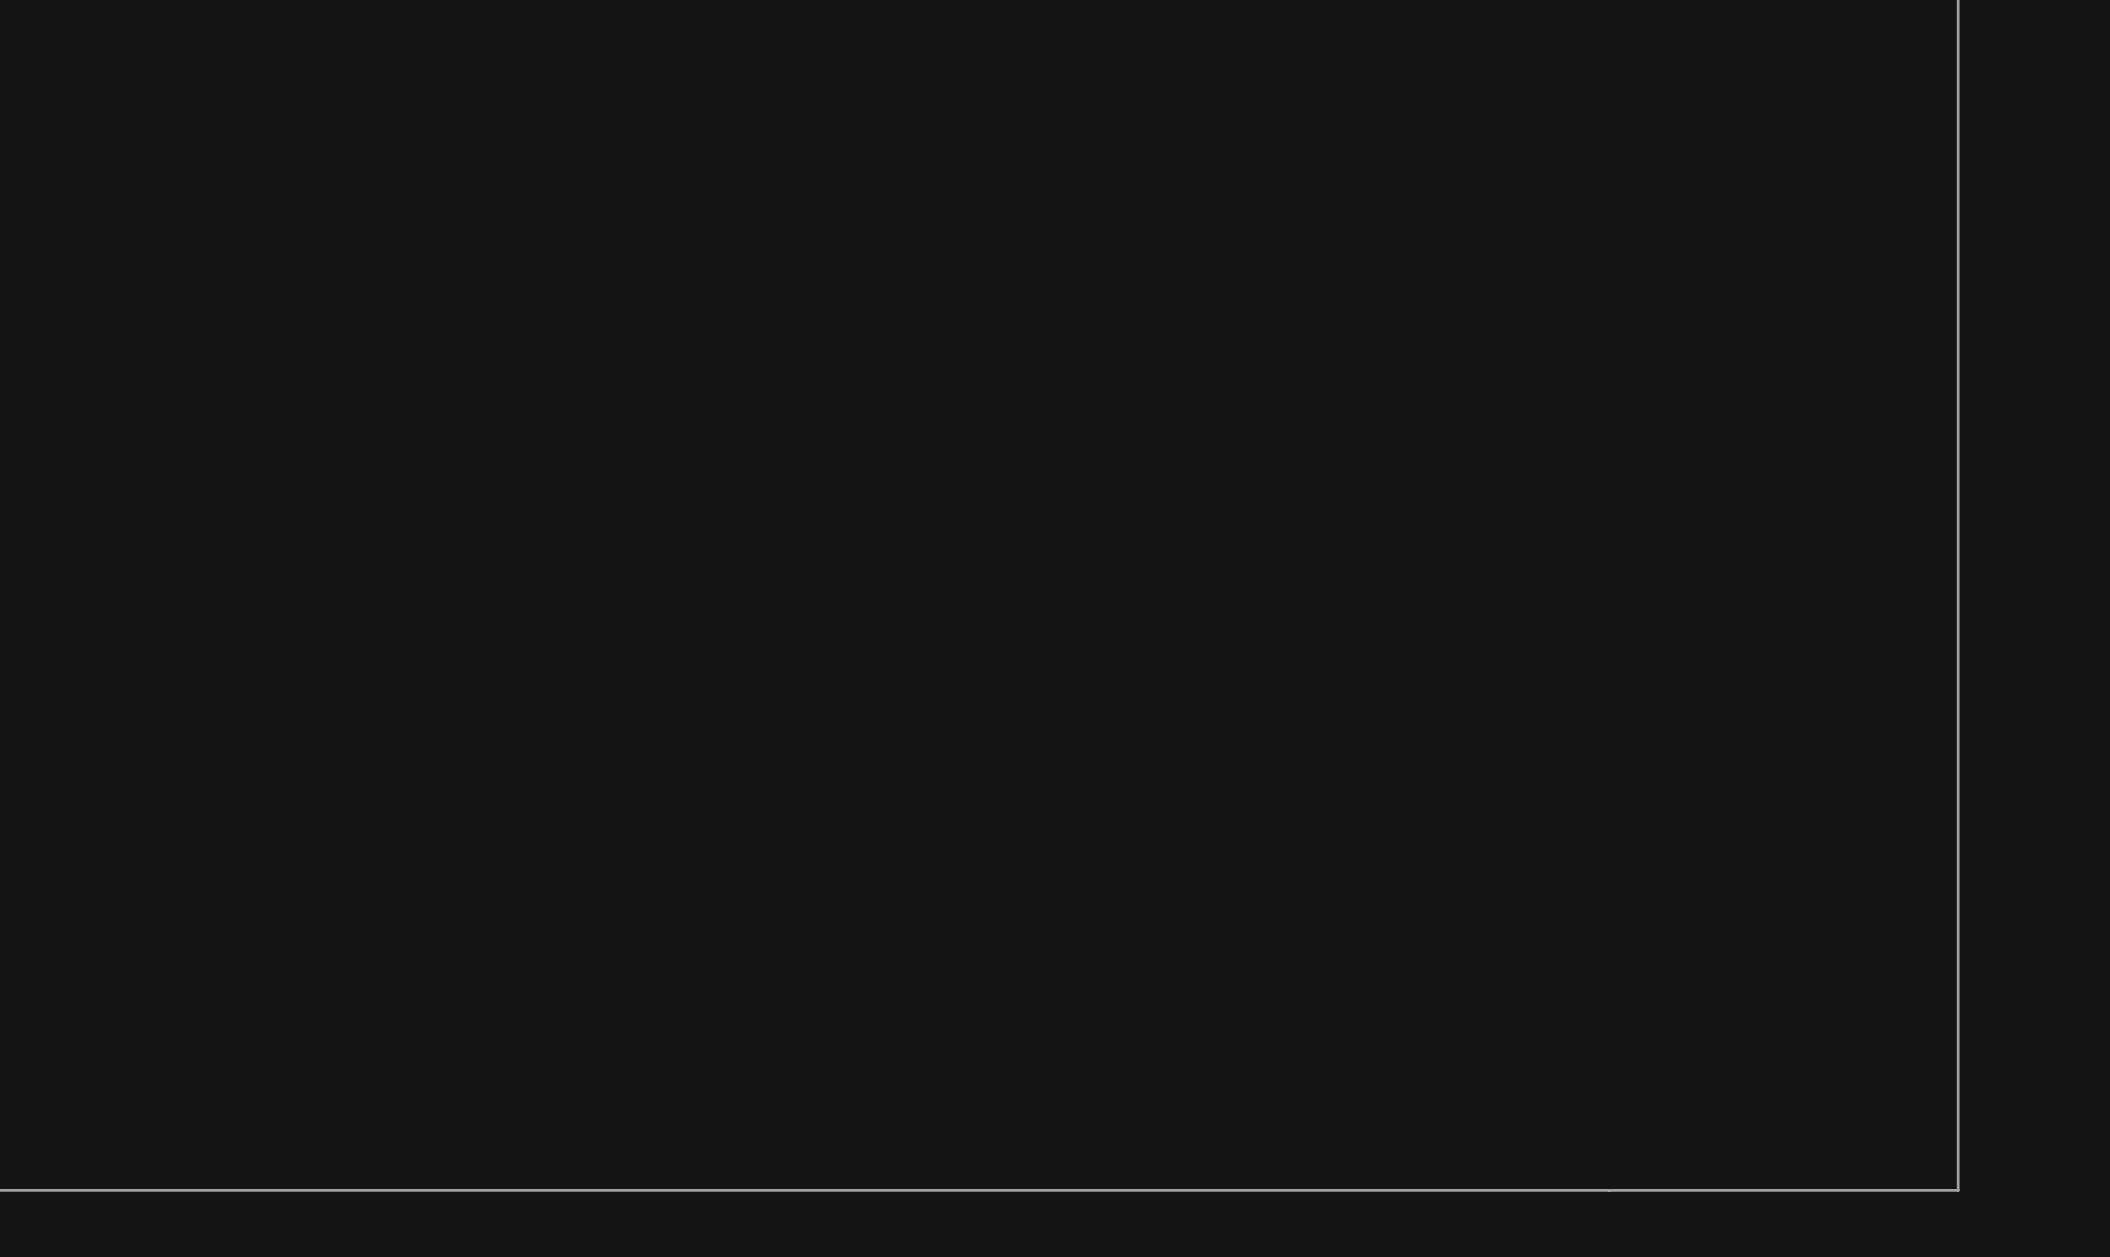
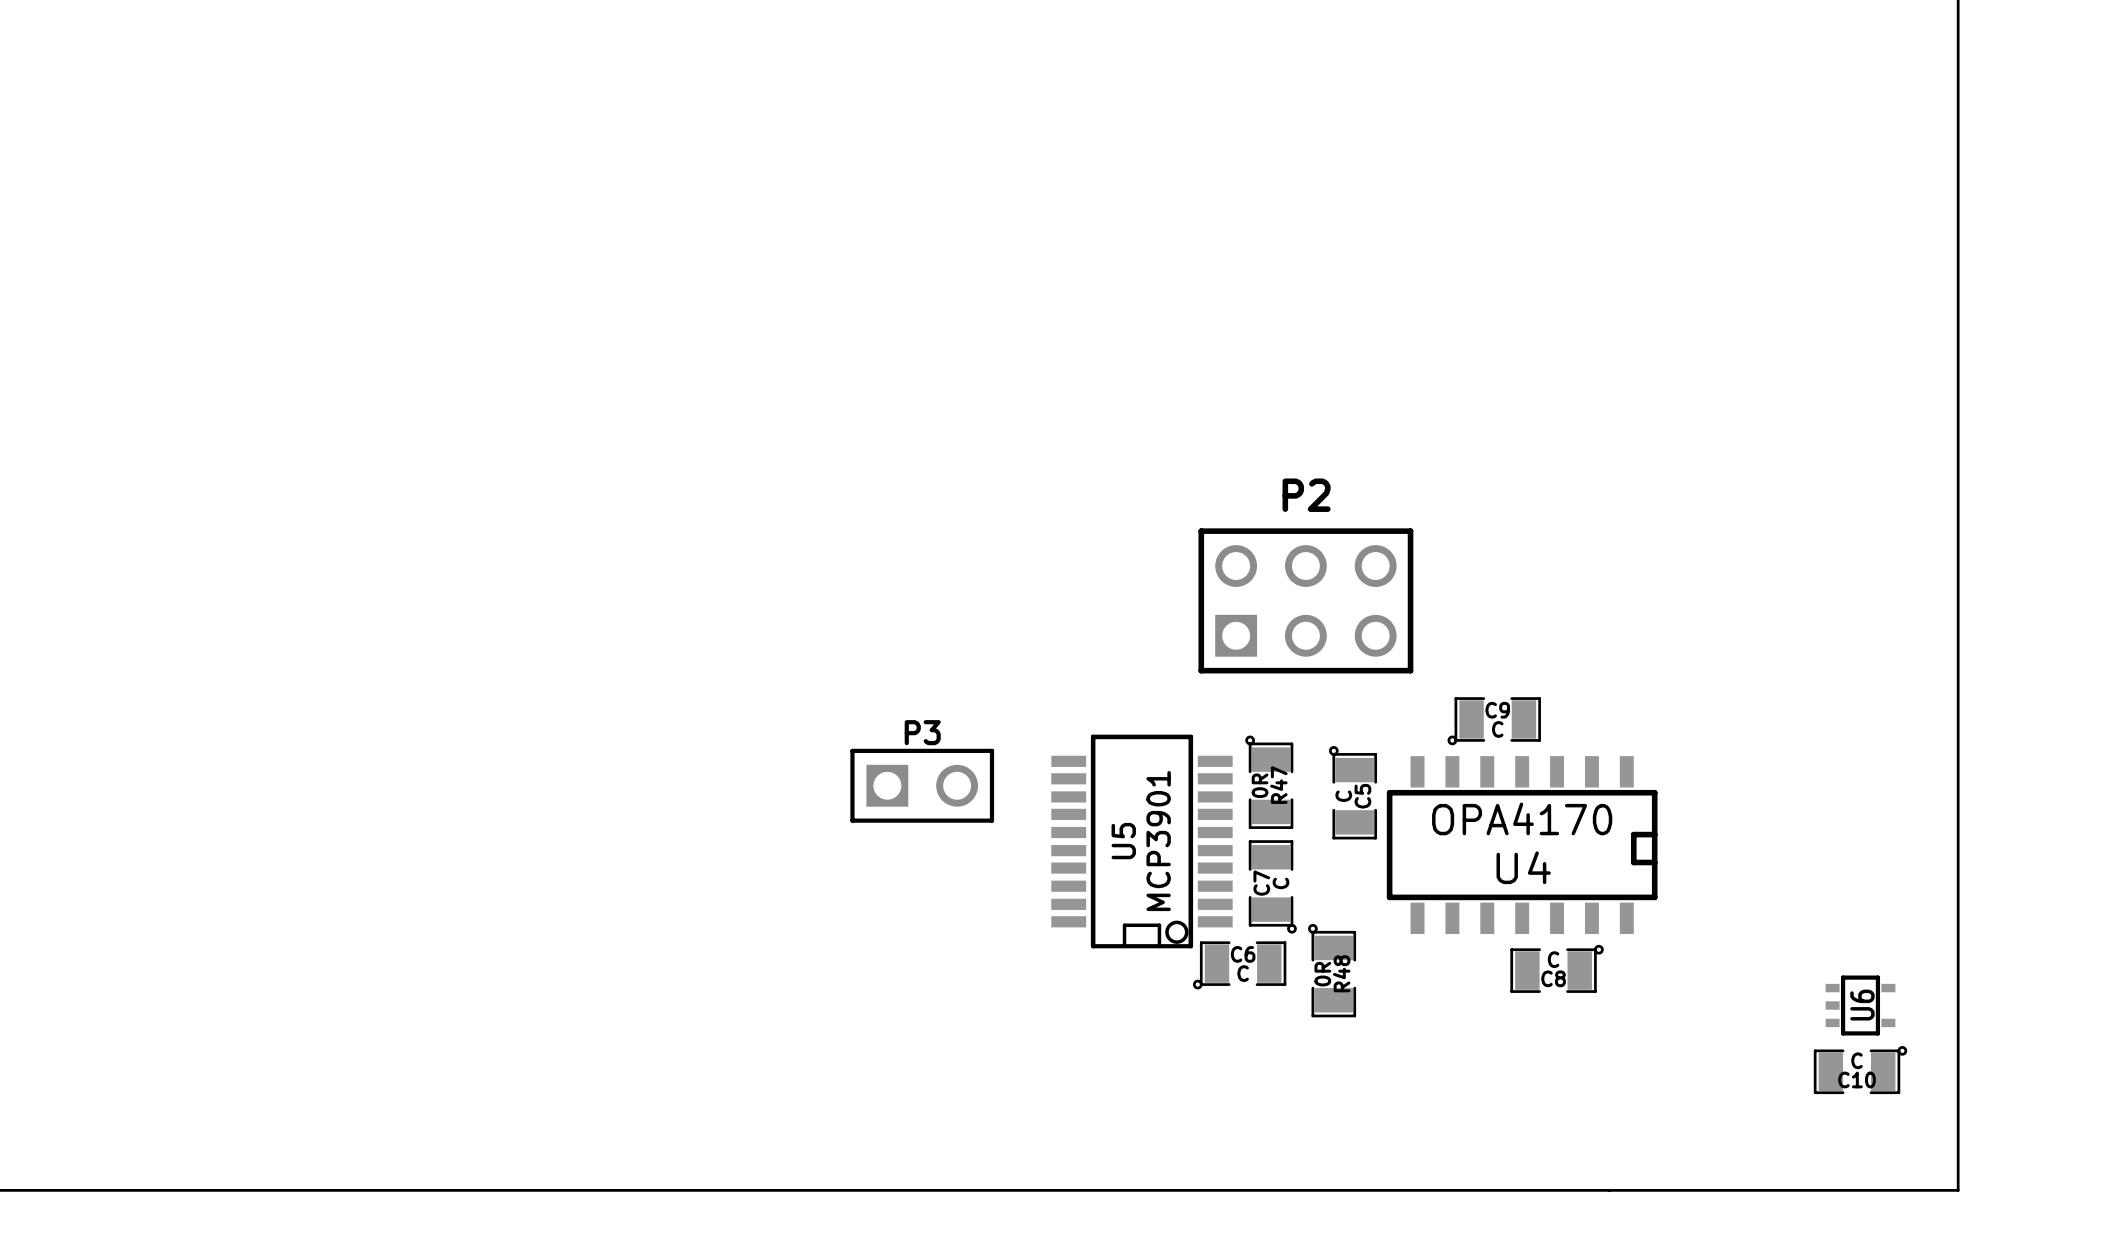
P2: none -> (1305, 600)
C9: none -> C (1494, 721)
R47: none -> 0R (1269, 782)
P3: none -> (922, 785)
C5: none -> C (1353, 792)
U5: none -> MCP3901 (1141, 841)
U4: none -> OPA4170 (1522, 845)
C7: none -> C (1272, 886)
C6: none -> C (1239, 965)
C8: none -> C (1557, 968)
R48: none -> 0R (1332, 970)
U6: none -> (1860, 1005)
C10: none -> C (1860, 1070)

